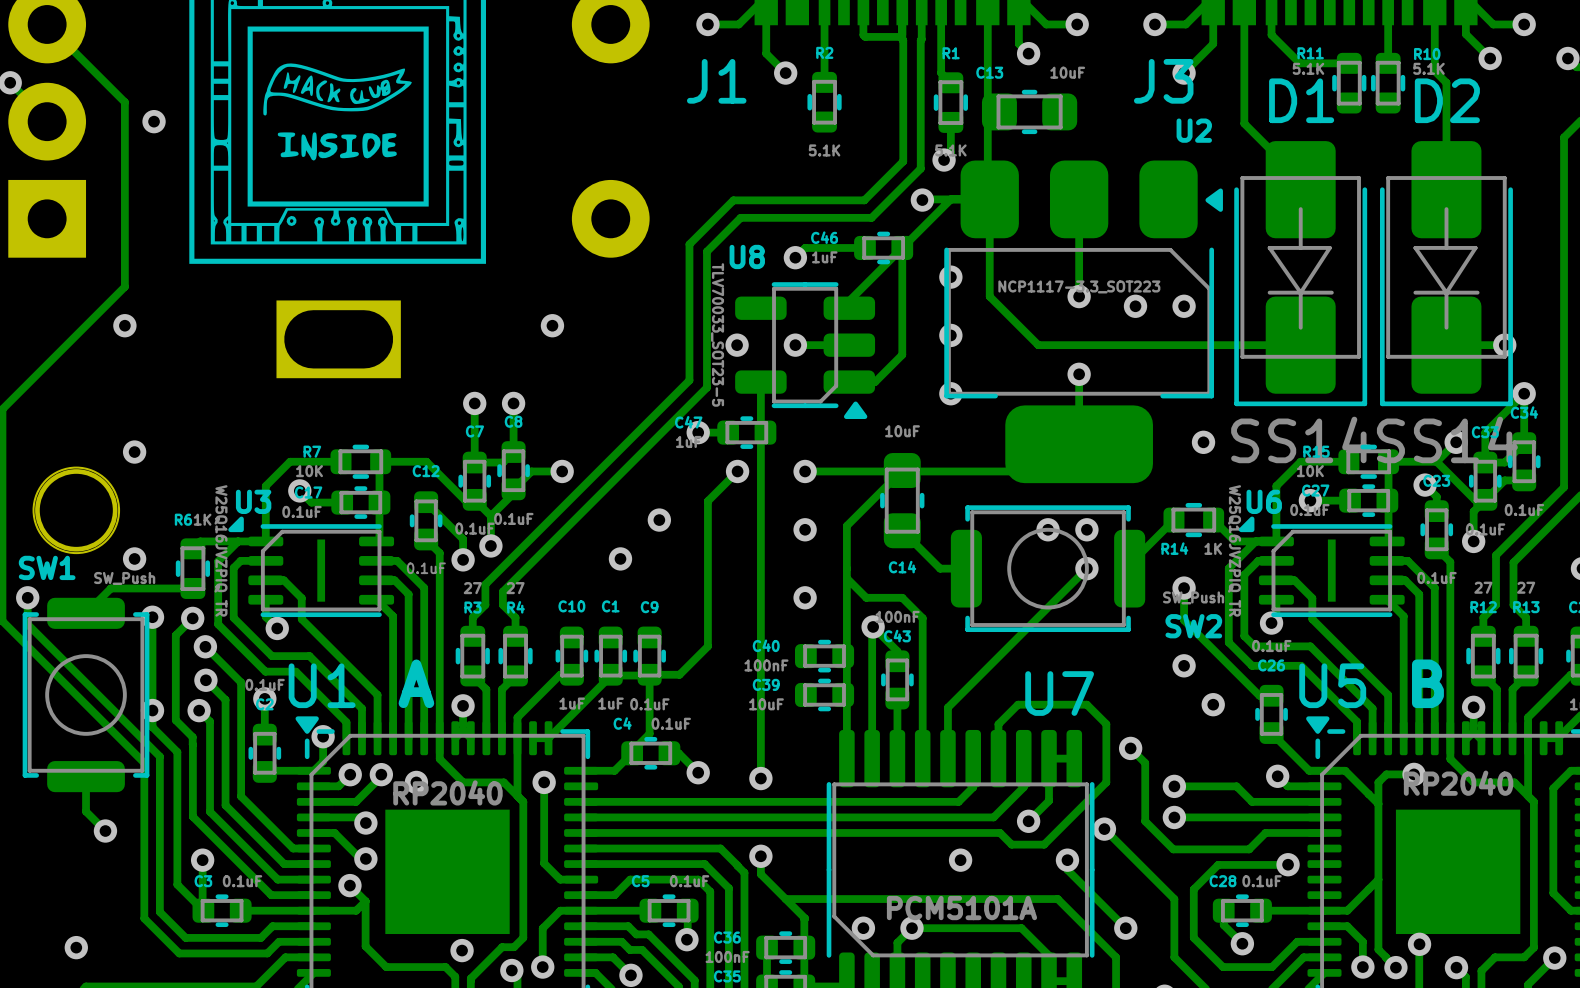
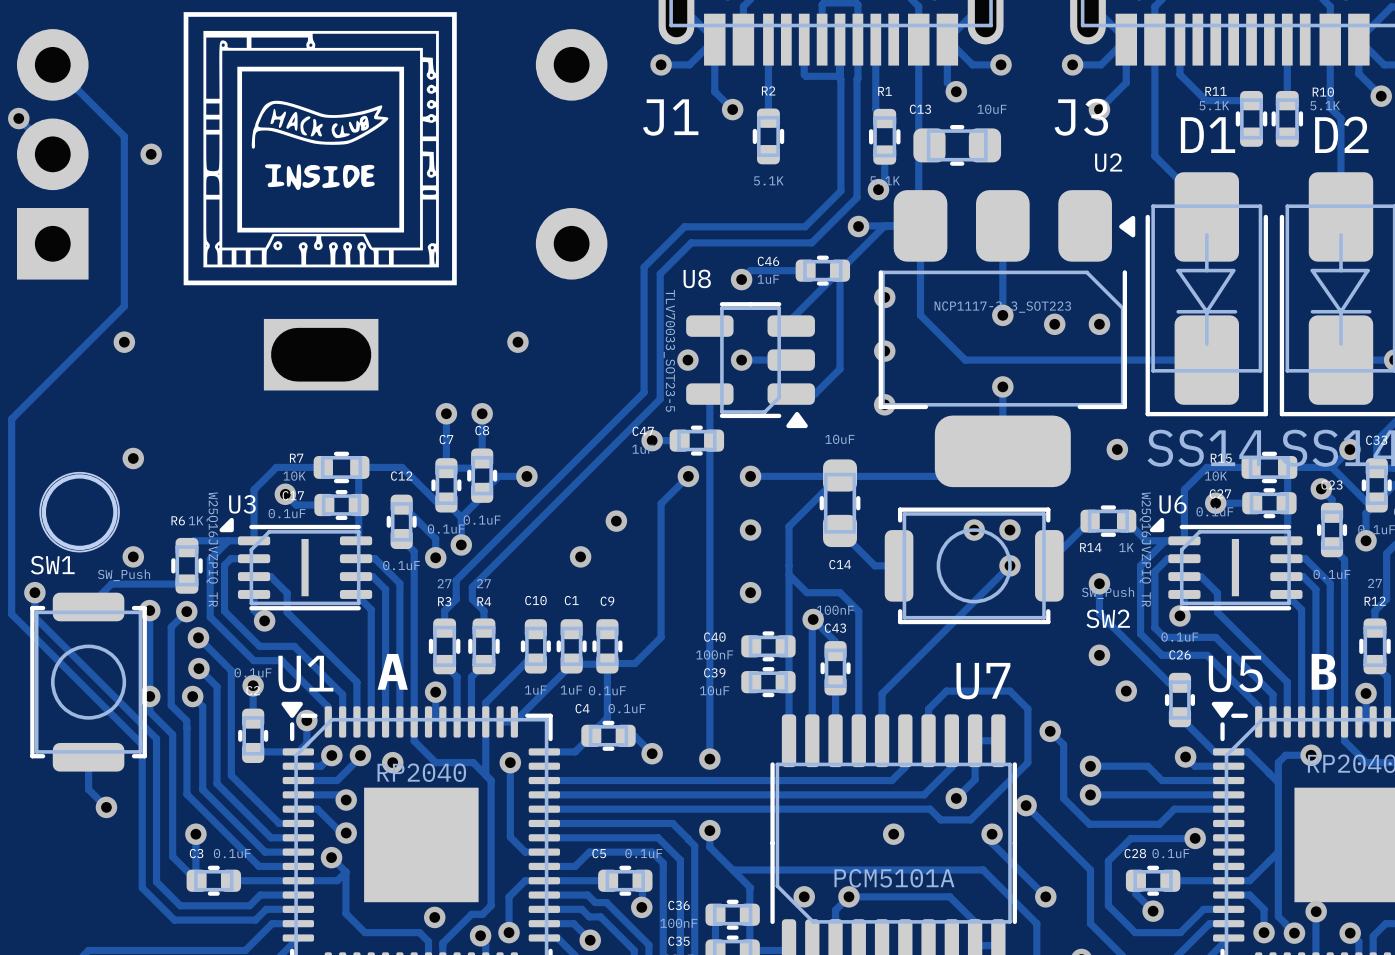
via: (76, 947) -> none

